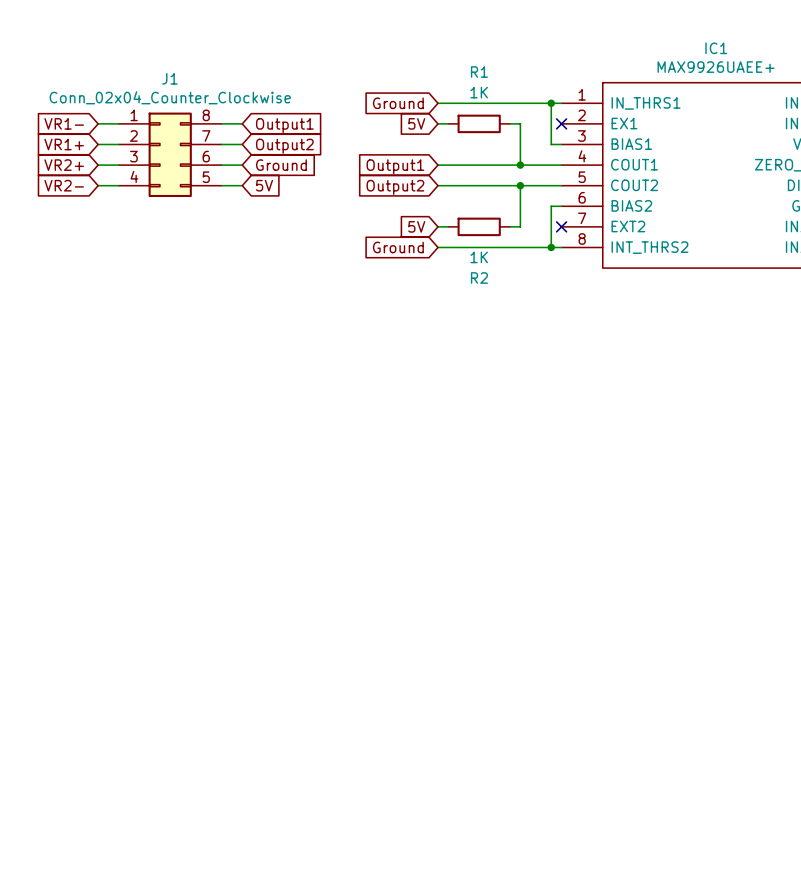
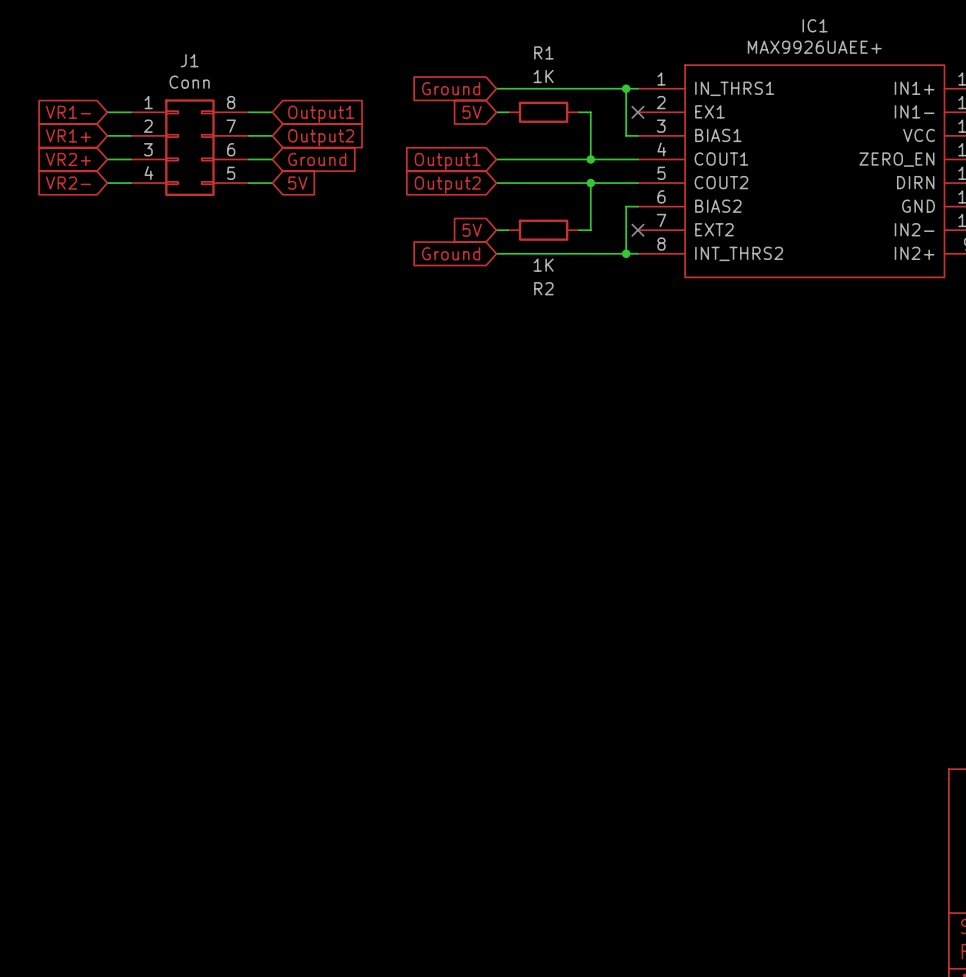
J1 value: Conn_02x04_Counter_Clockwise (170, 97) -> Conn (189, 82)

